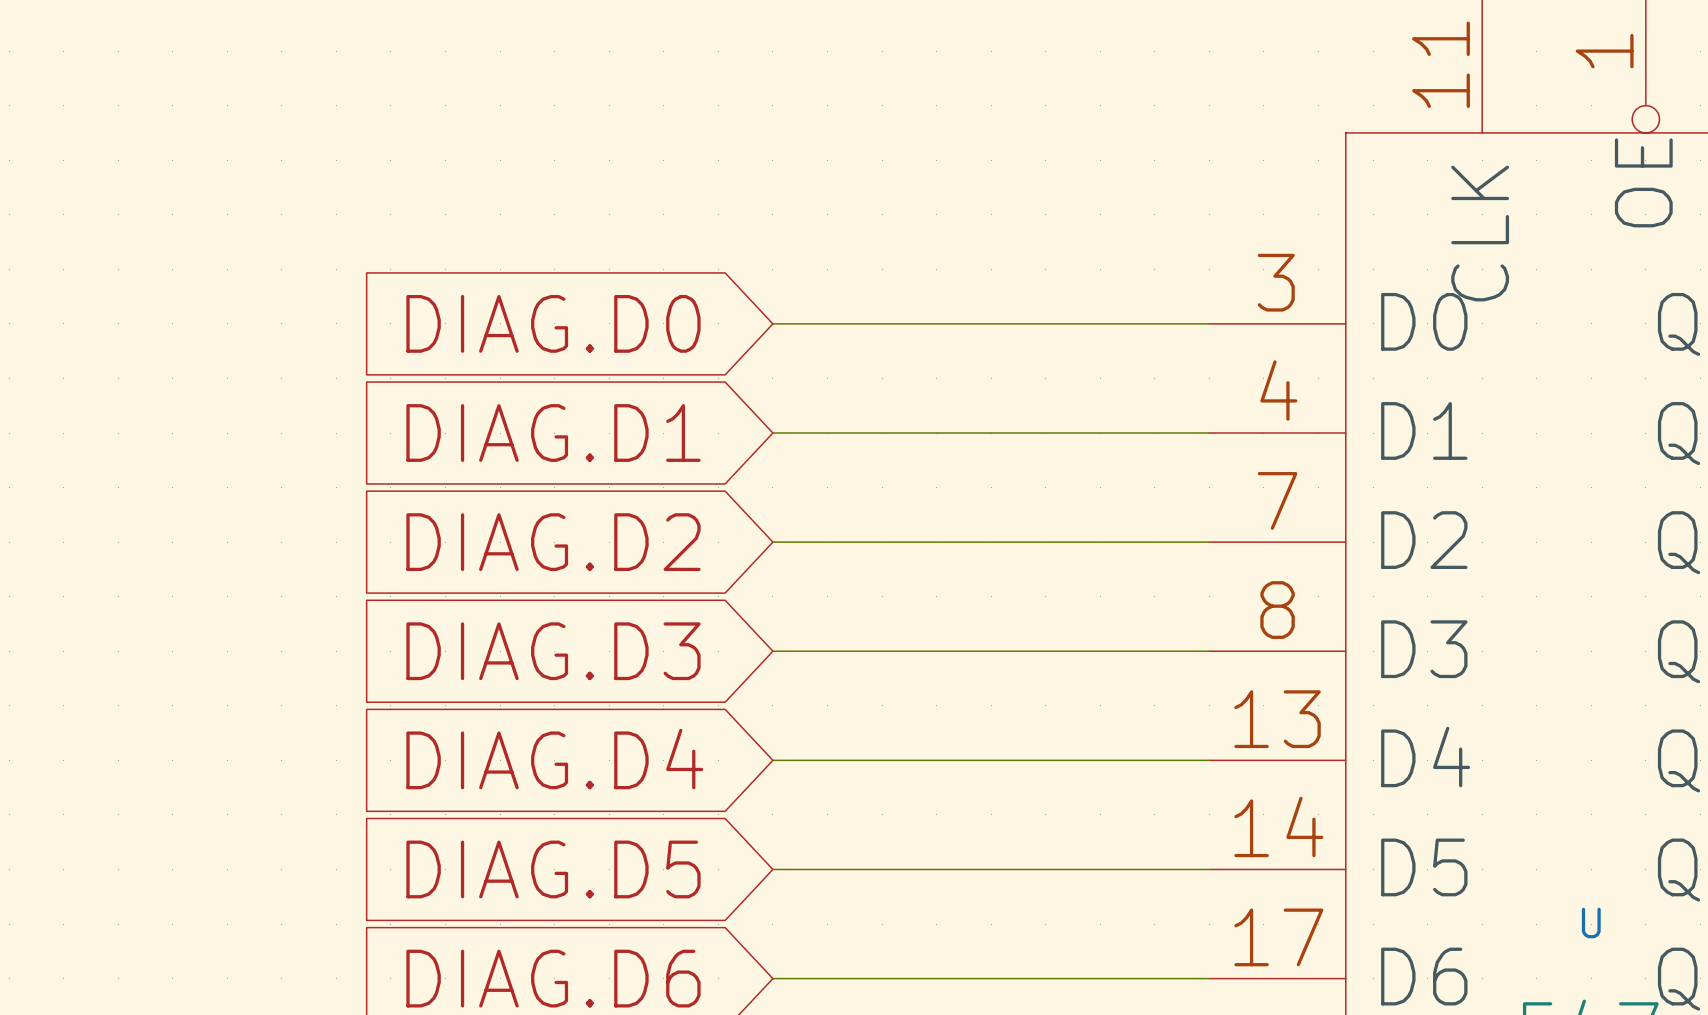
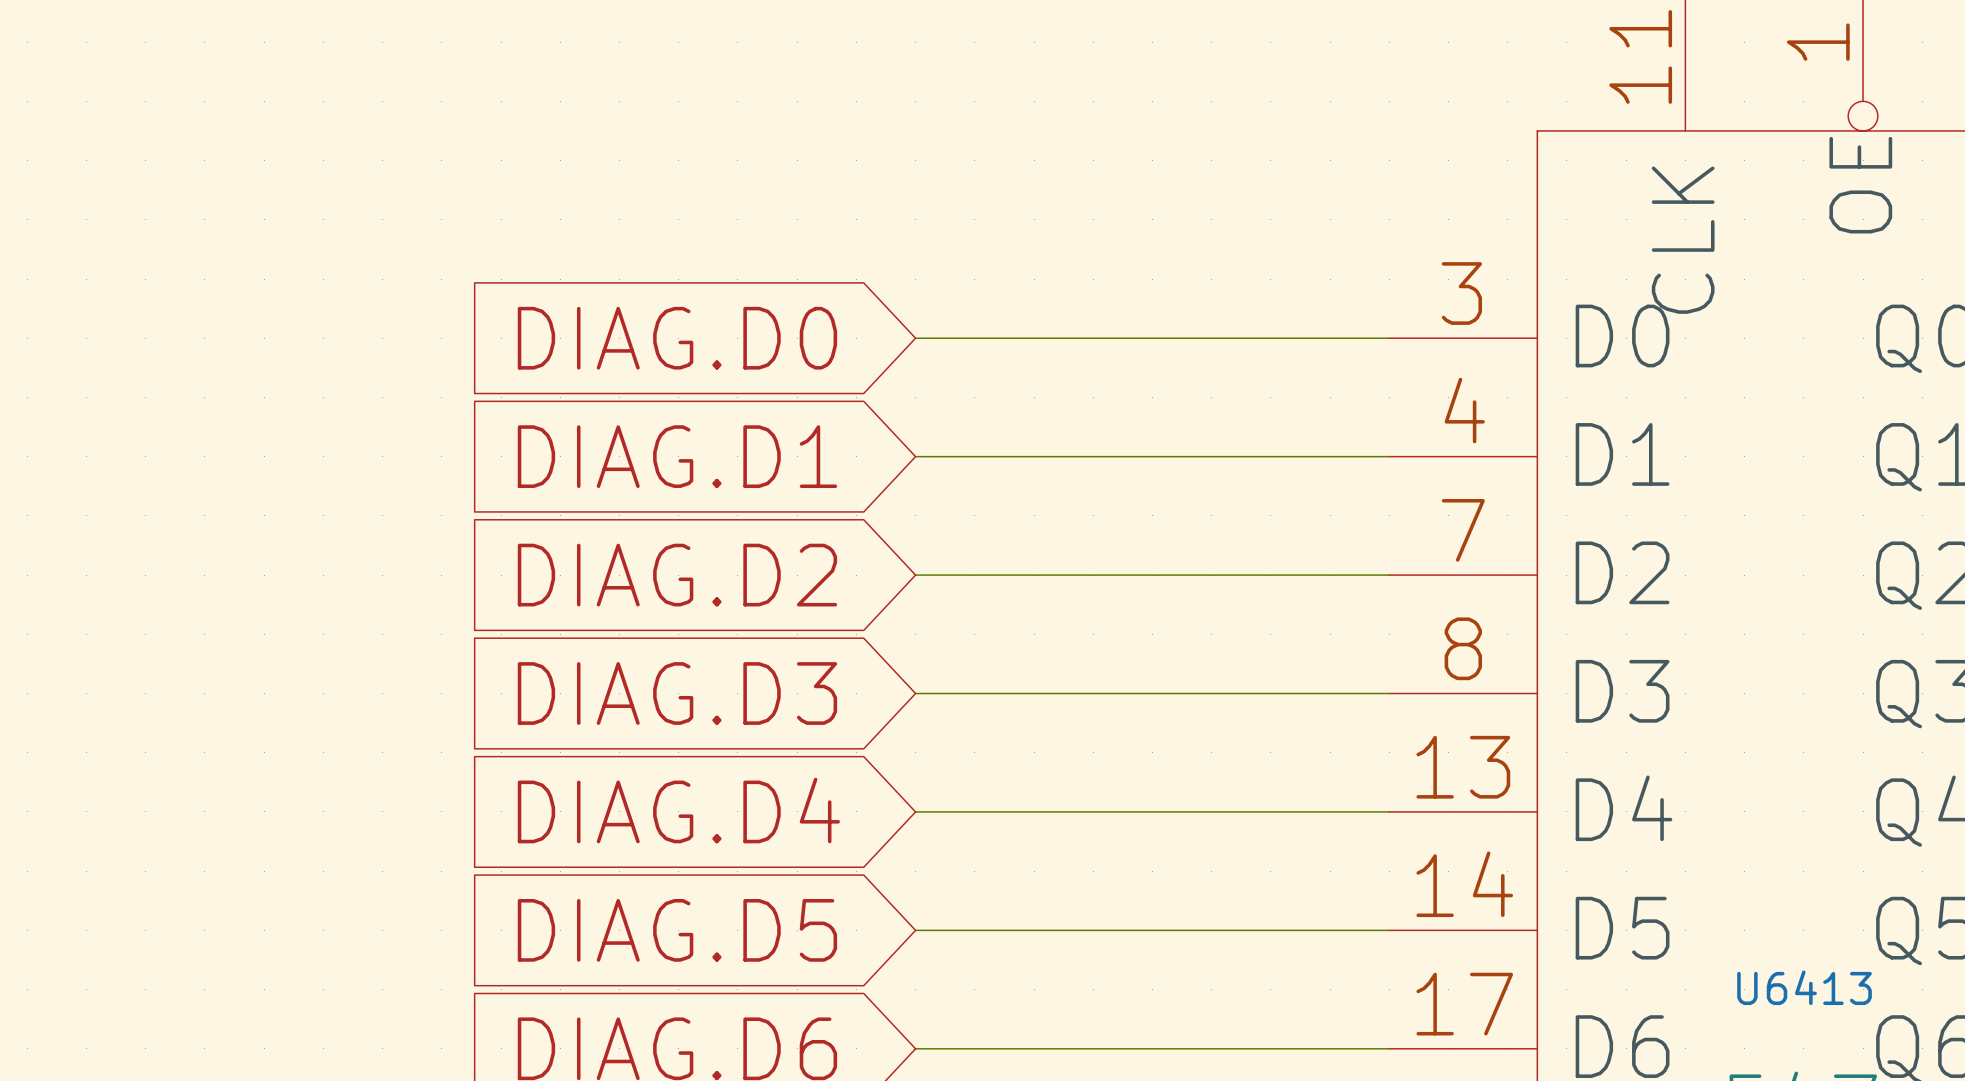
U name: U (1591, 923) -> U6413 (1804, 987)

